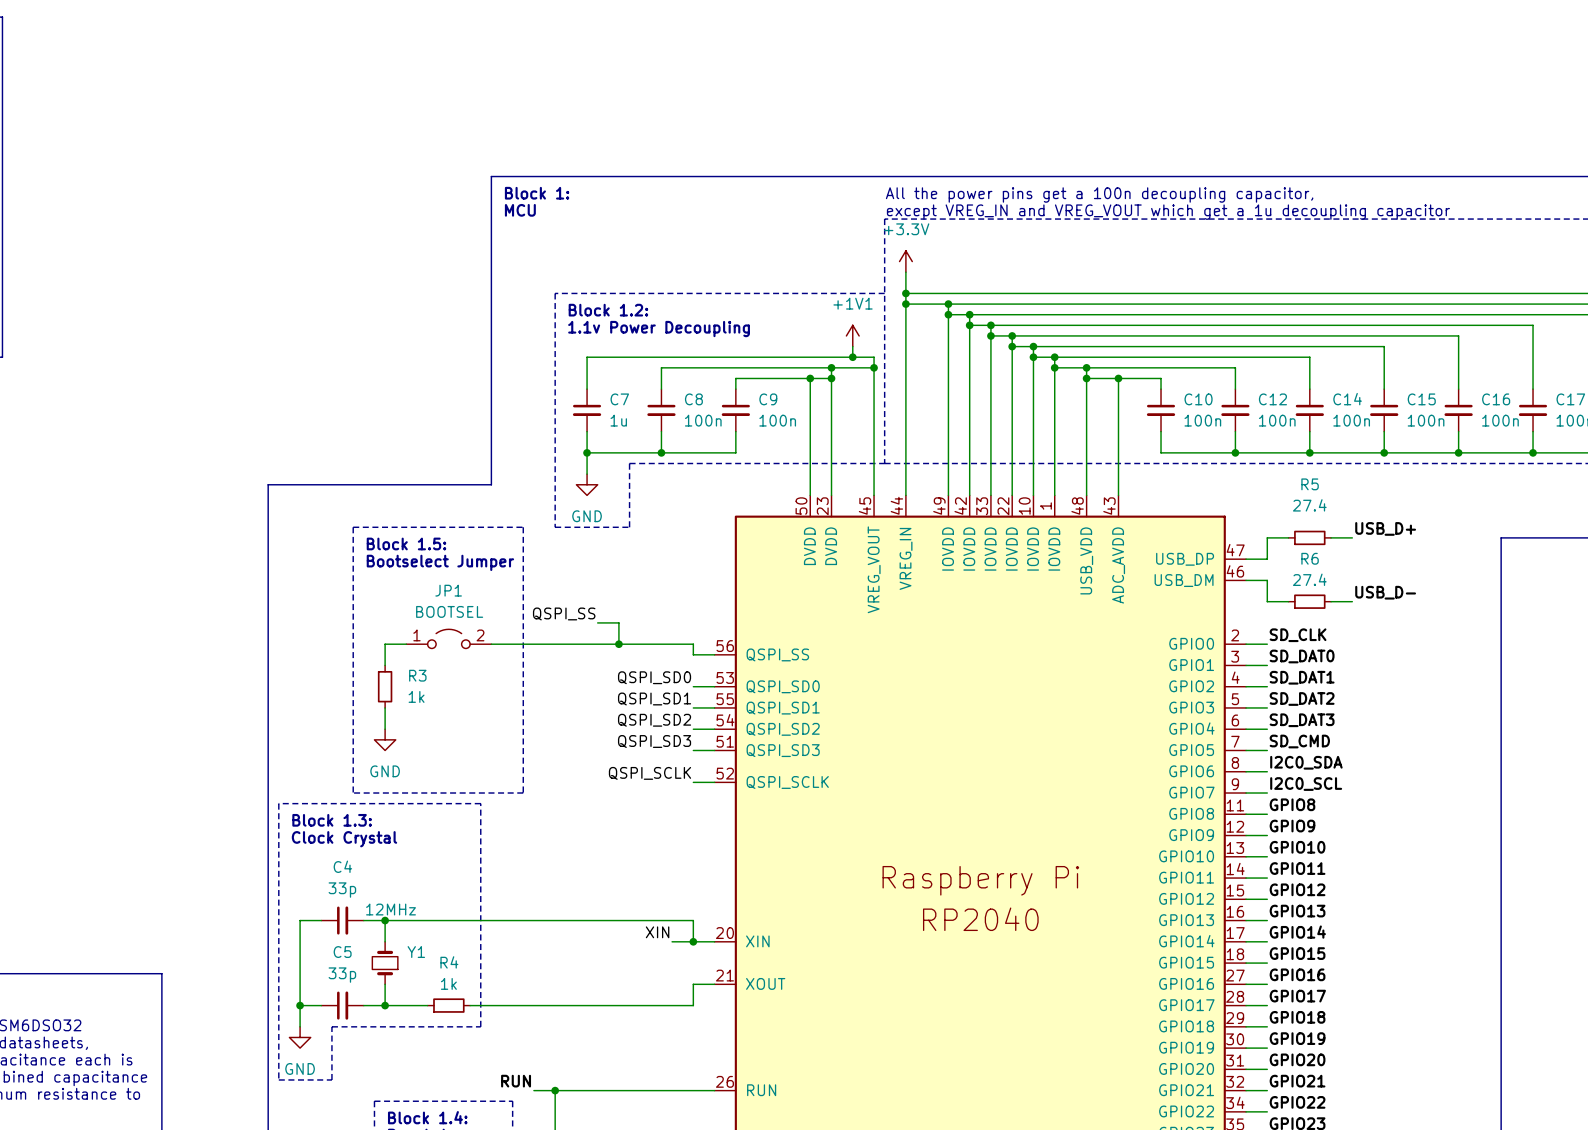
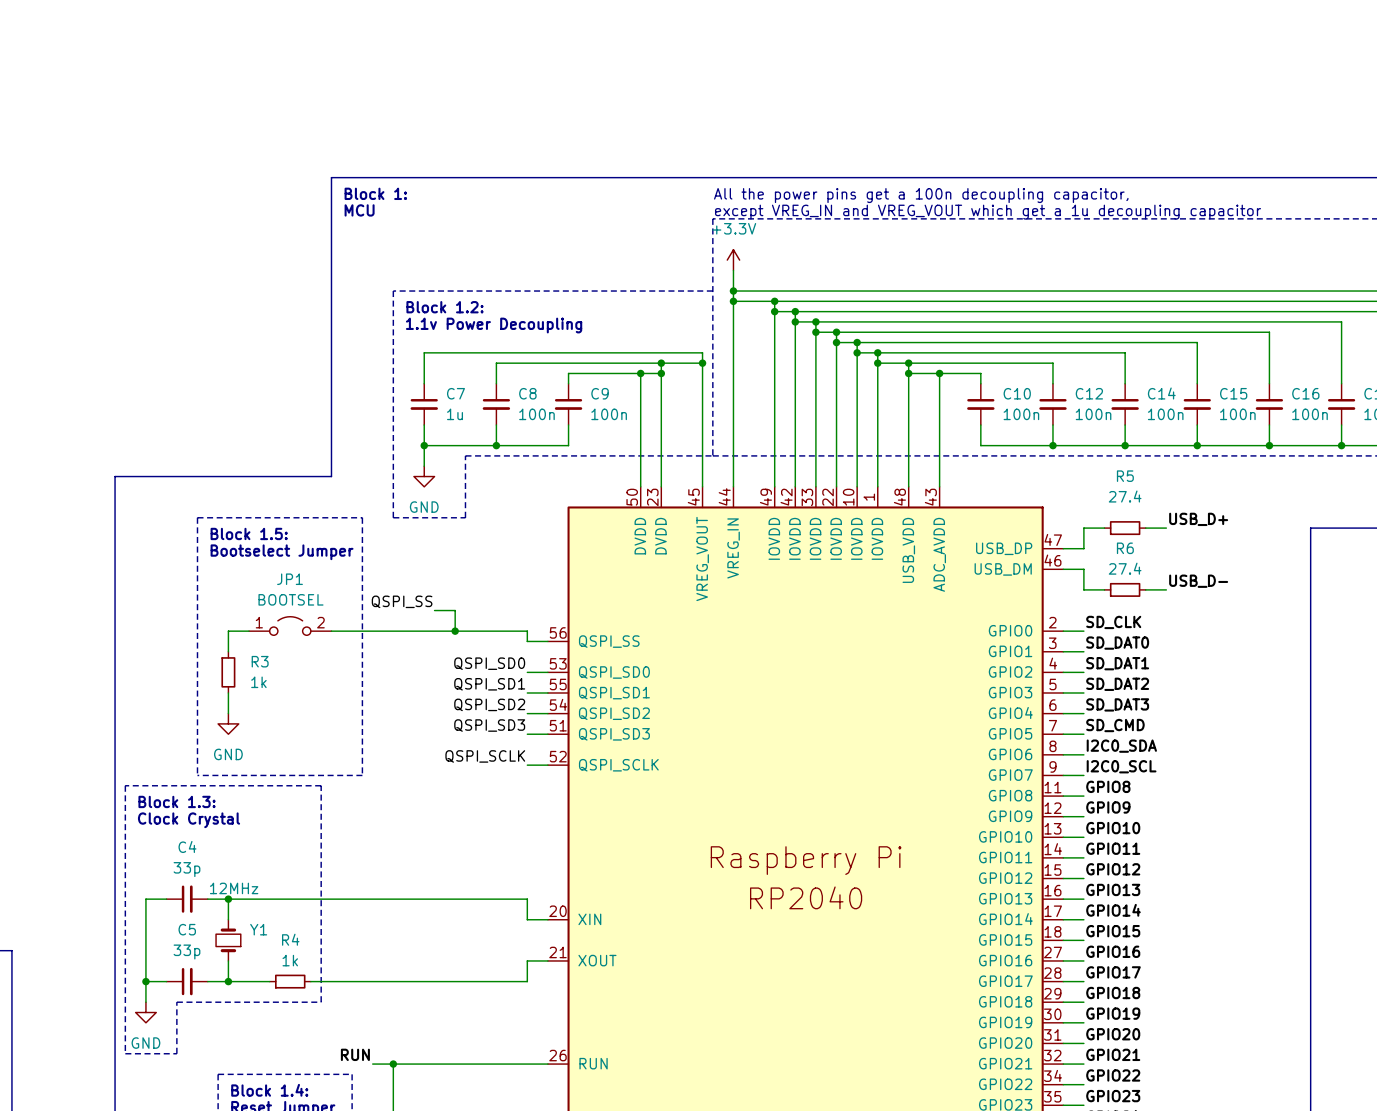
power symbol: +1V1 (852, 335) -> none
wire: (852, 346) (852, 357) -> none
junction: (852, 357) -> none
label: XIN (657, 932) -> none
wire: (672, 941) (693, 941) -> none
junction: (693, 941) -> none

